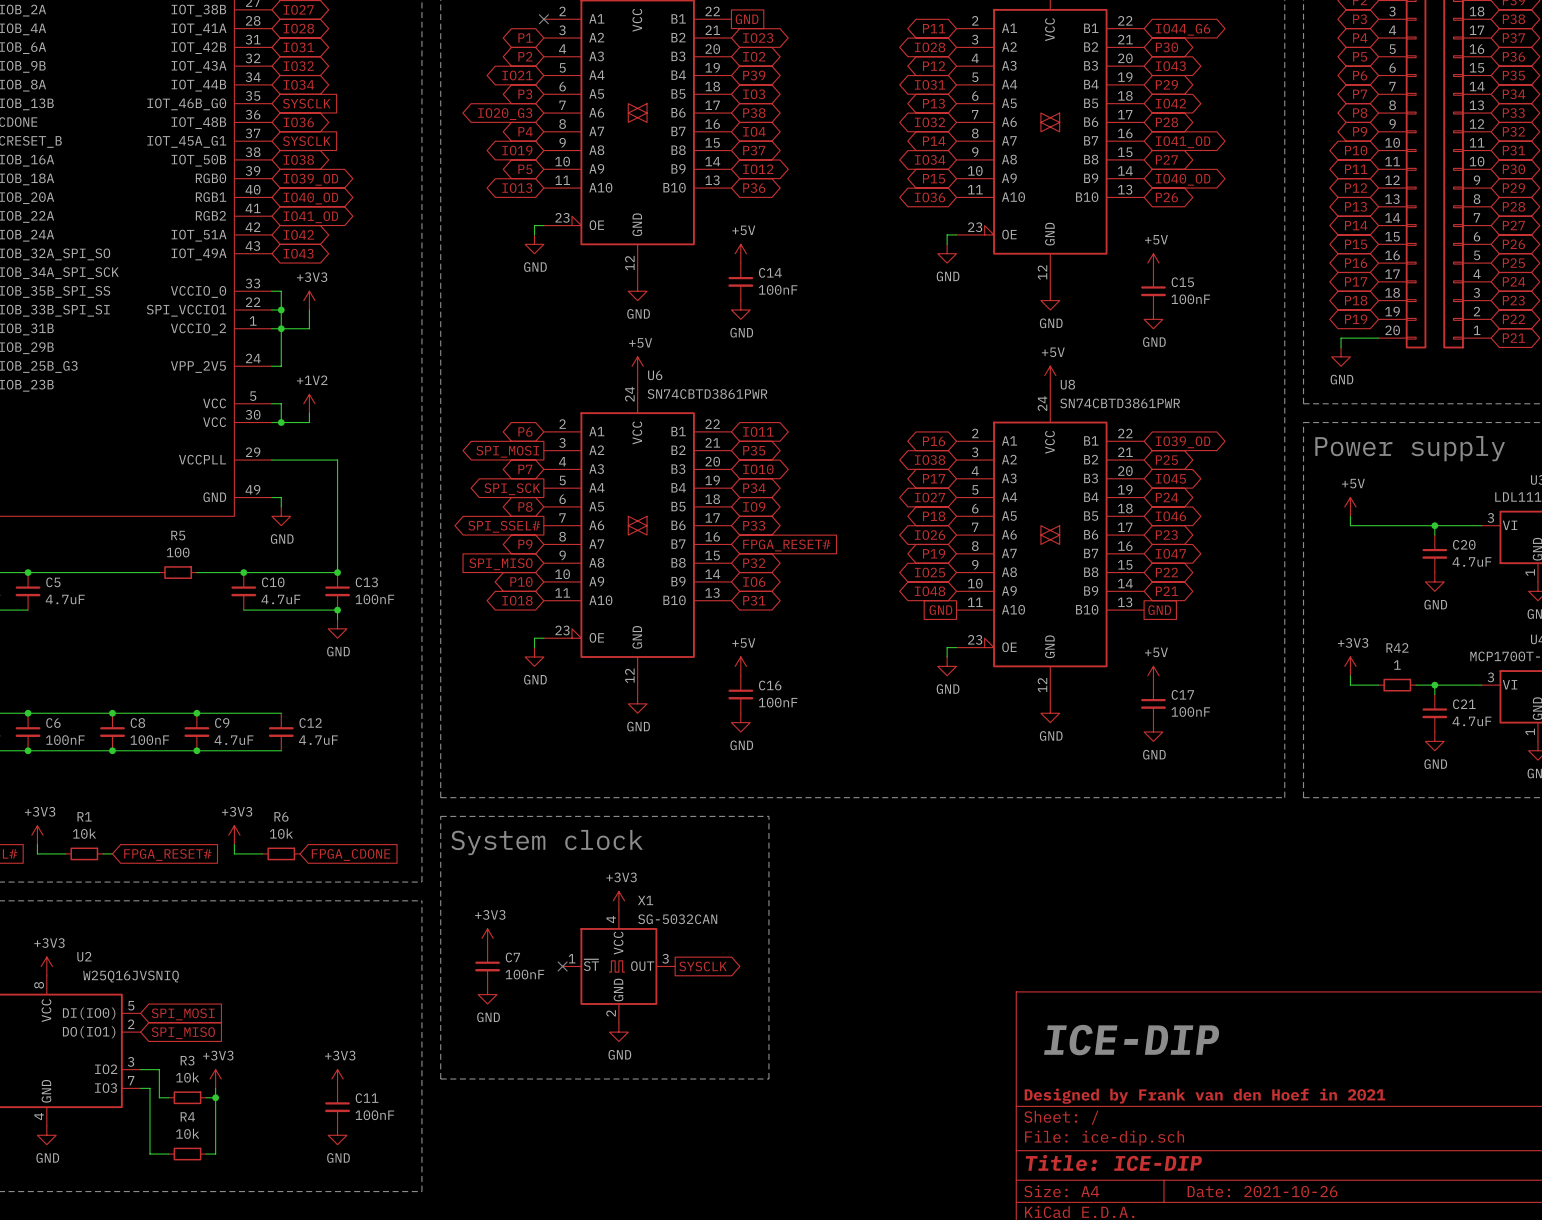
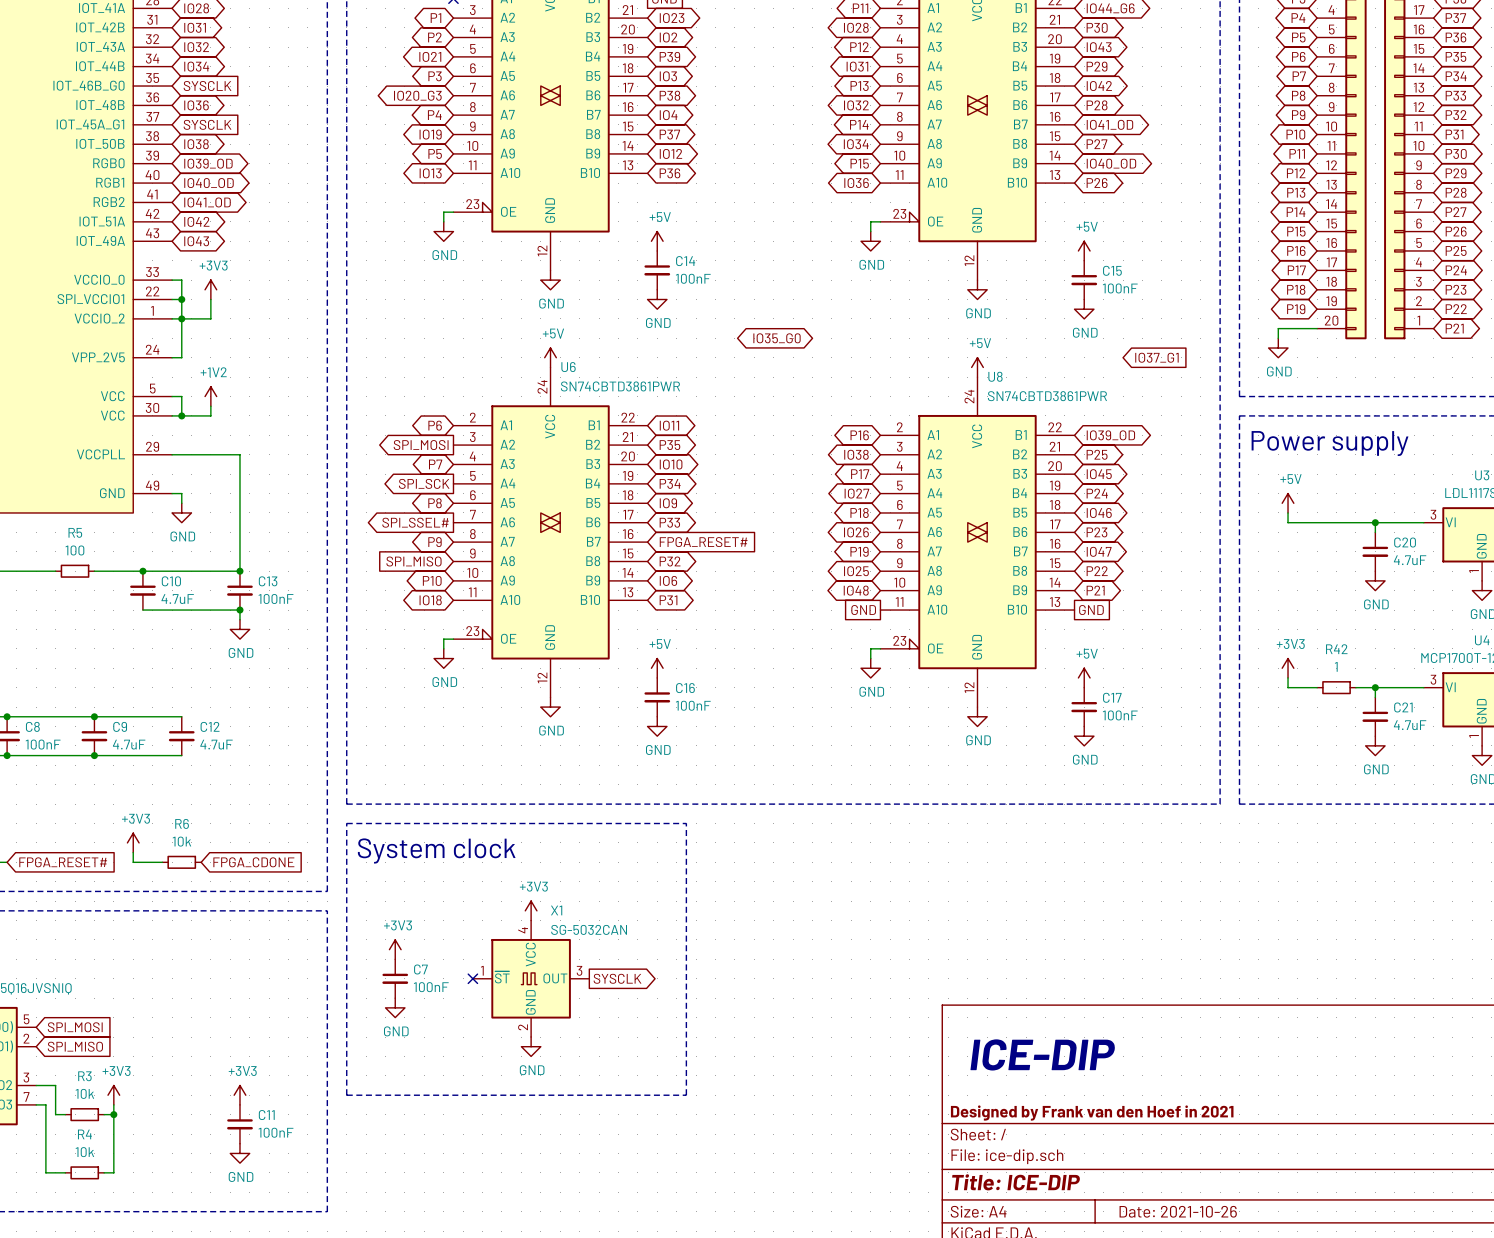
global label: none -> IO35_G0 (777, 338)
global label: none -> IO37_G1 (1156, 357)

